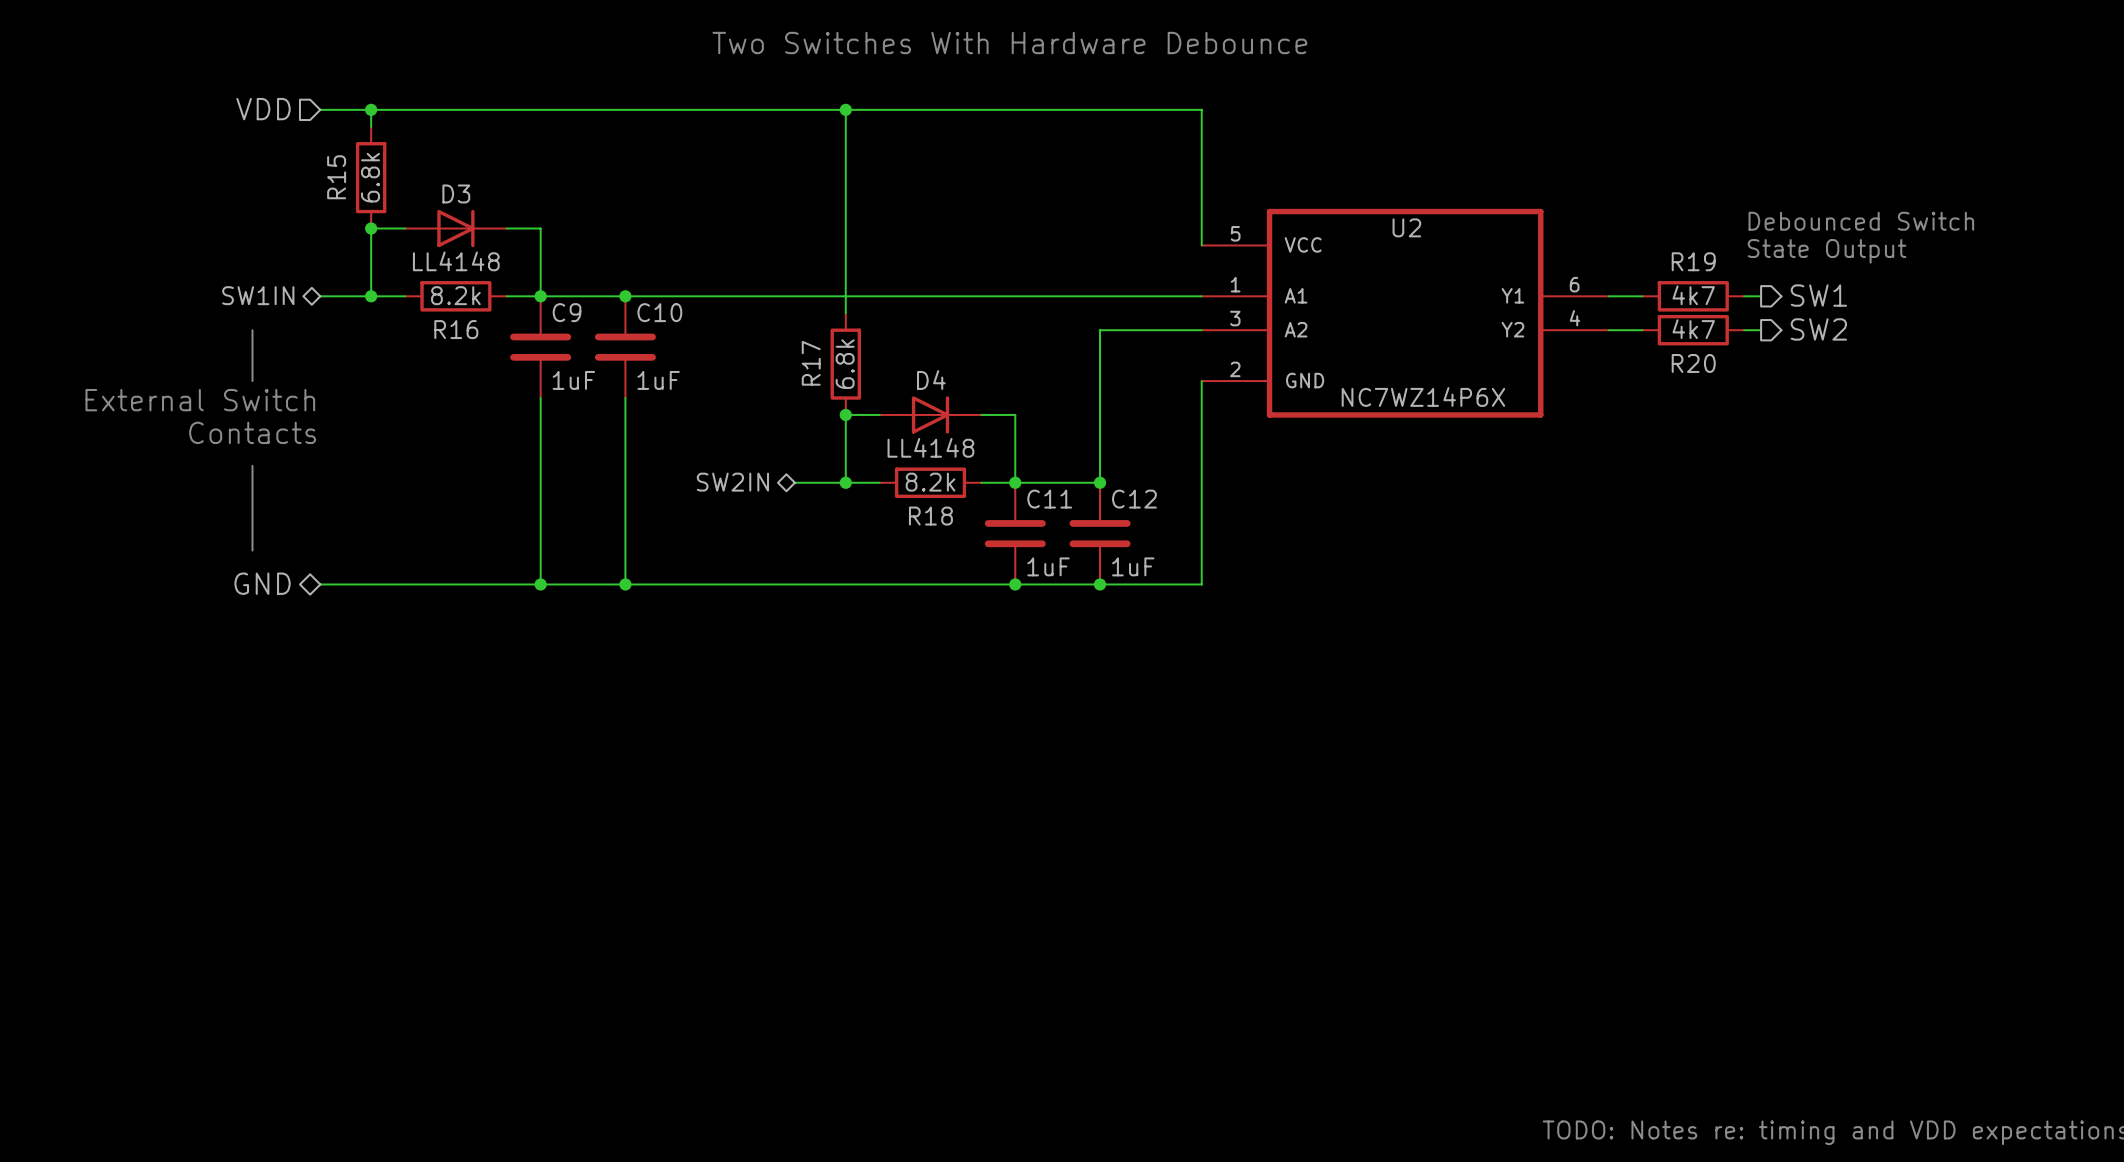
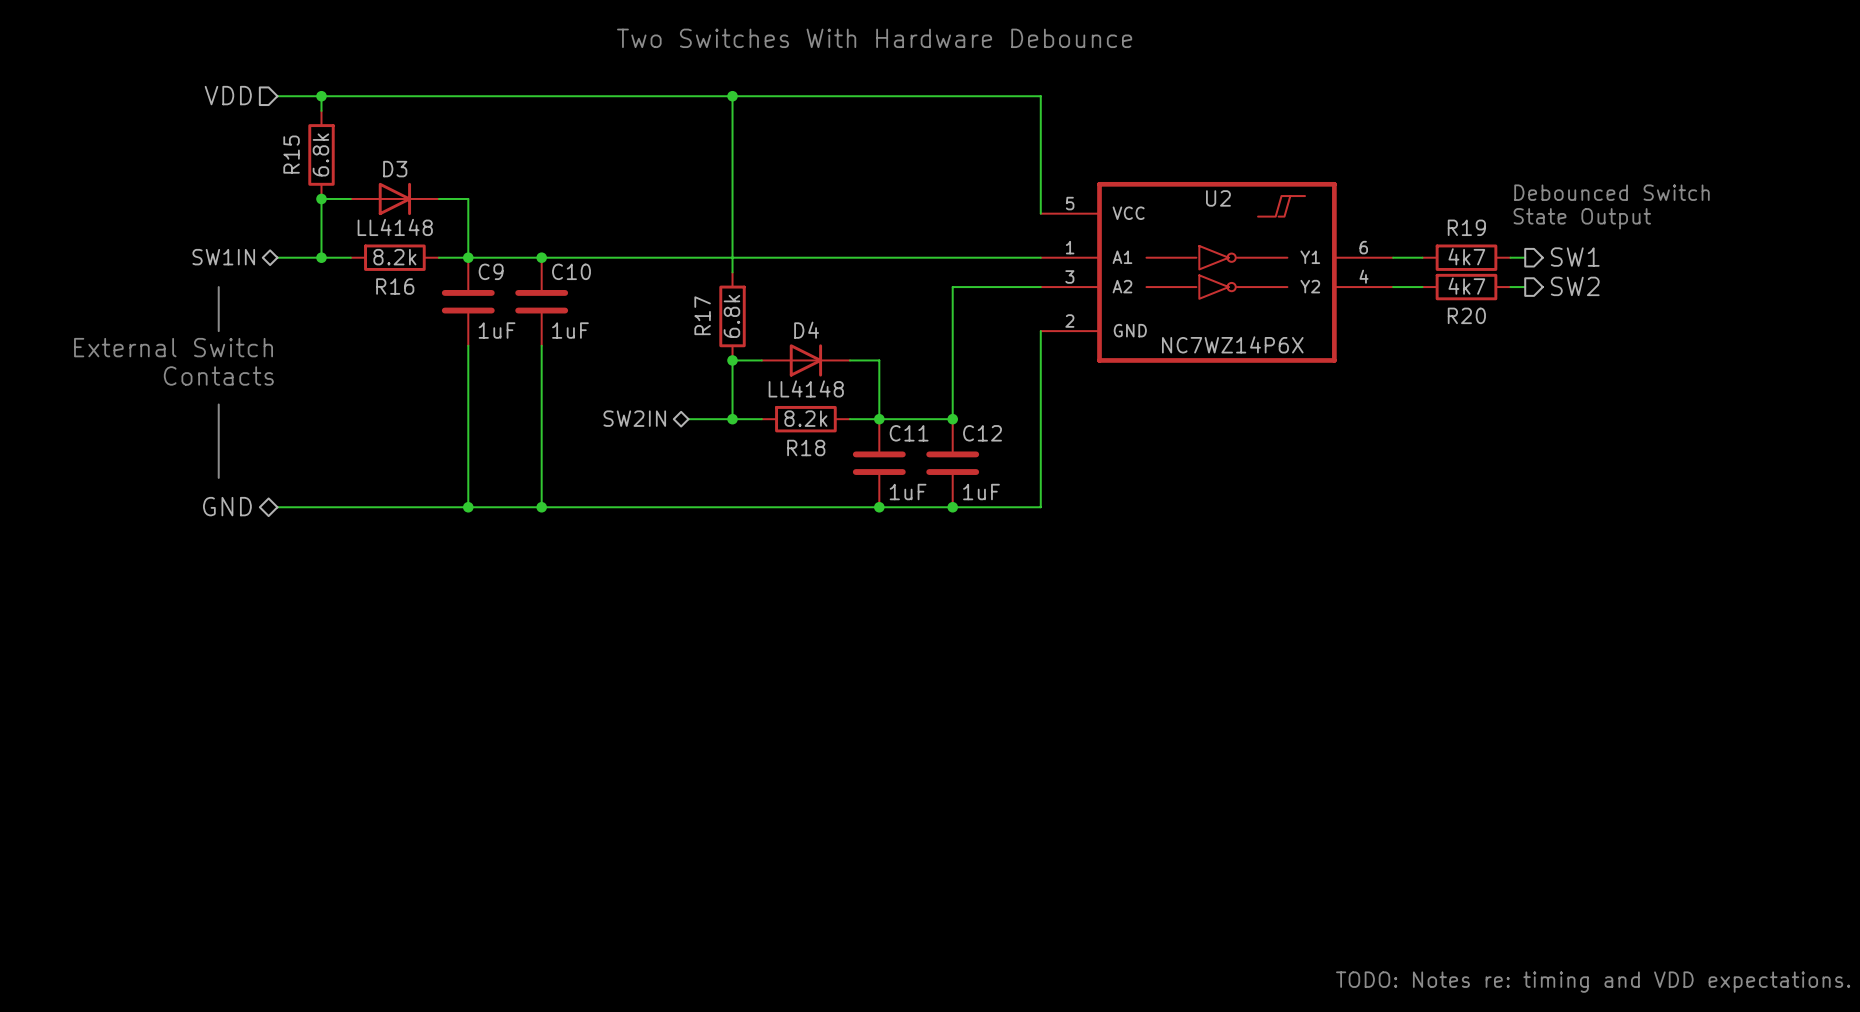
U2 symbol: [1201, 208, 1609, 418] -> [1040, 181, 1394, 363]

